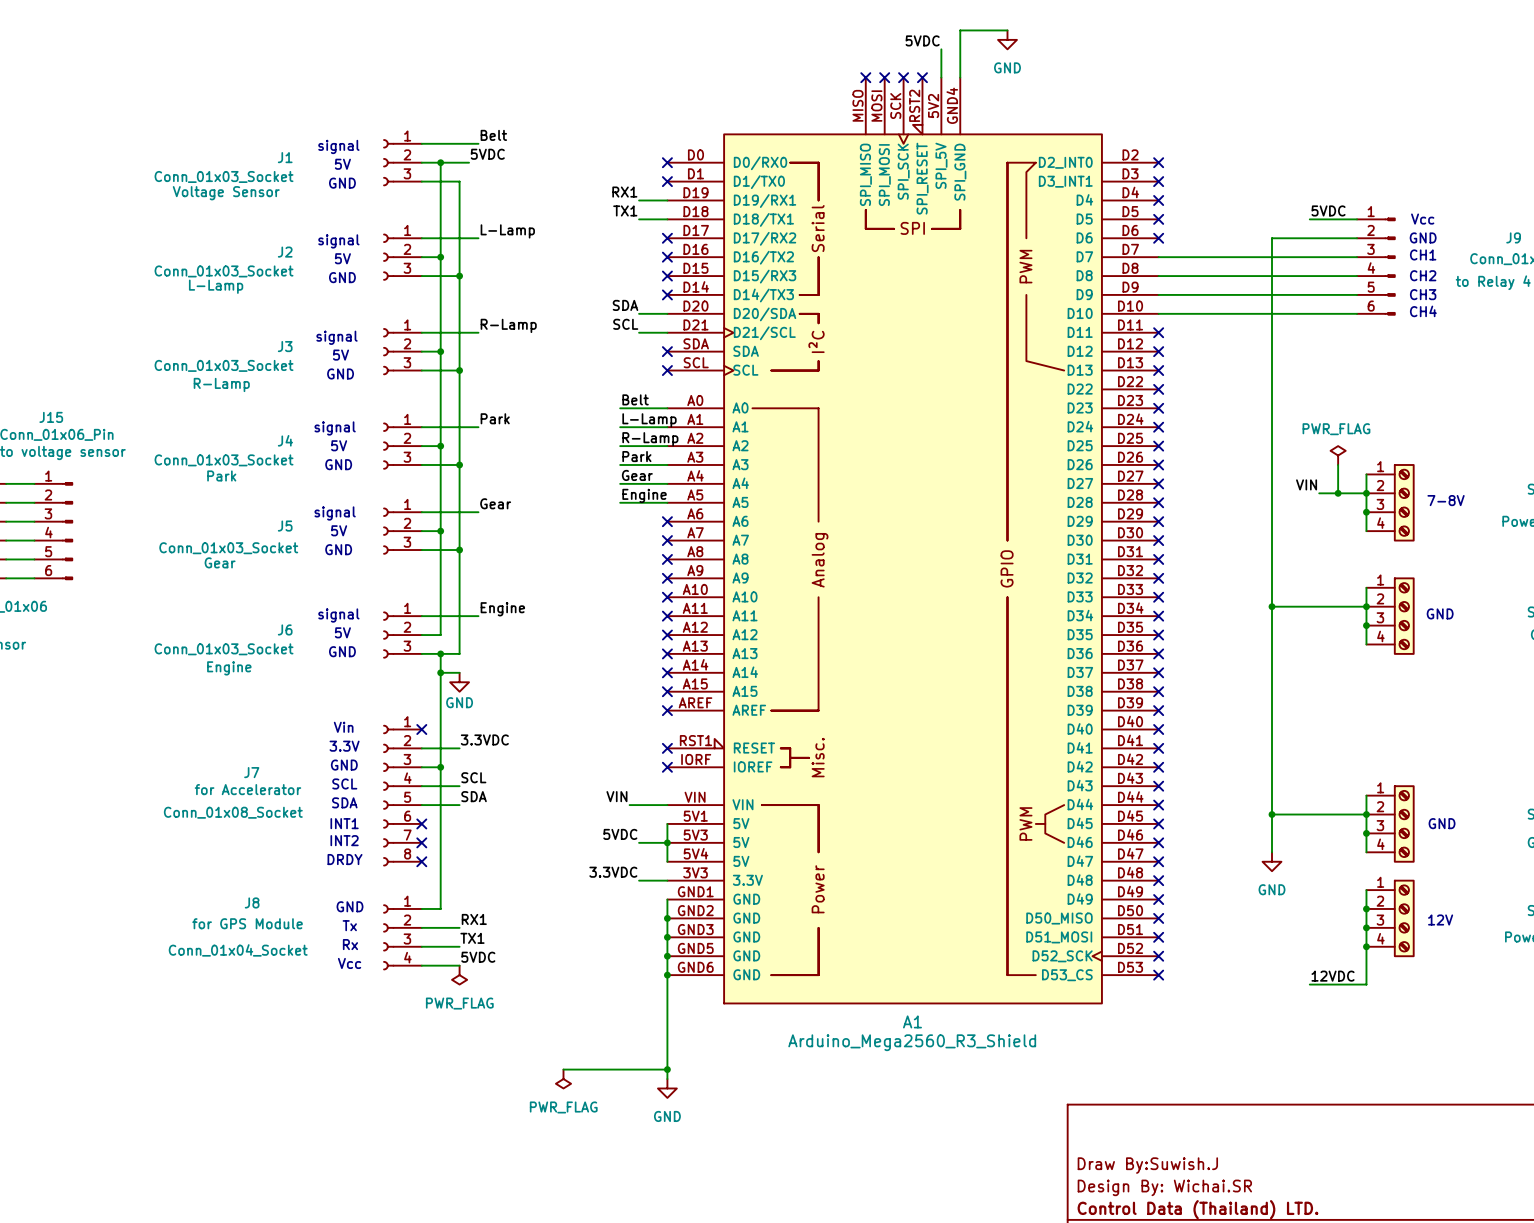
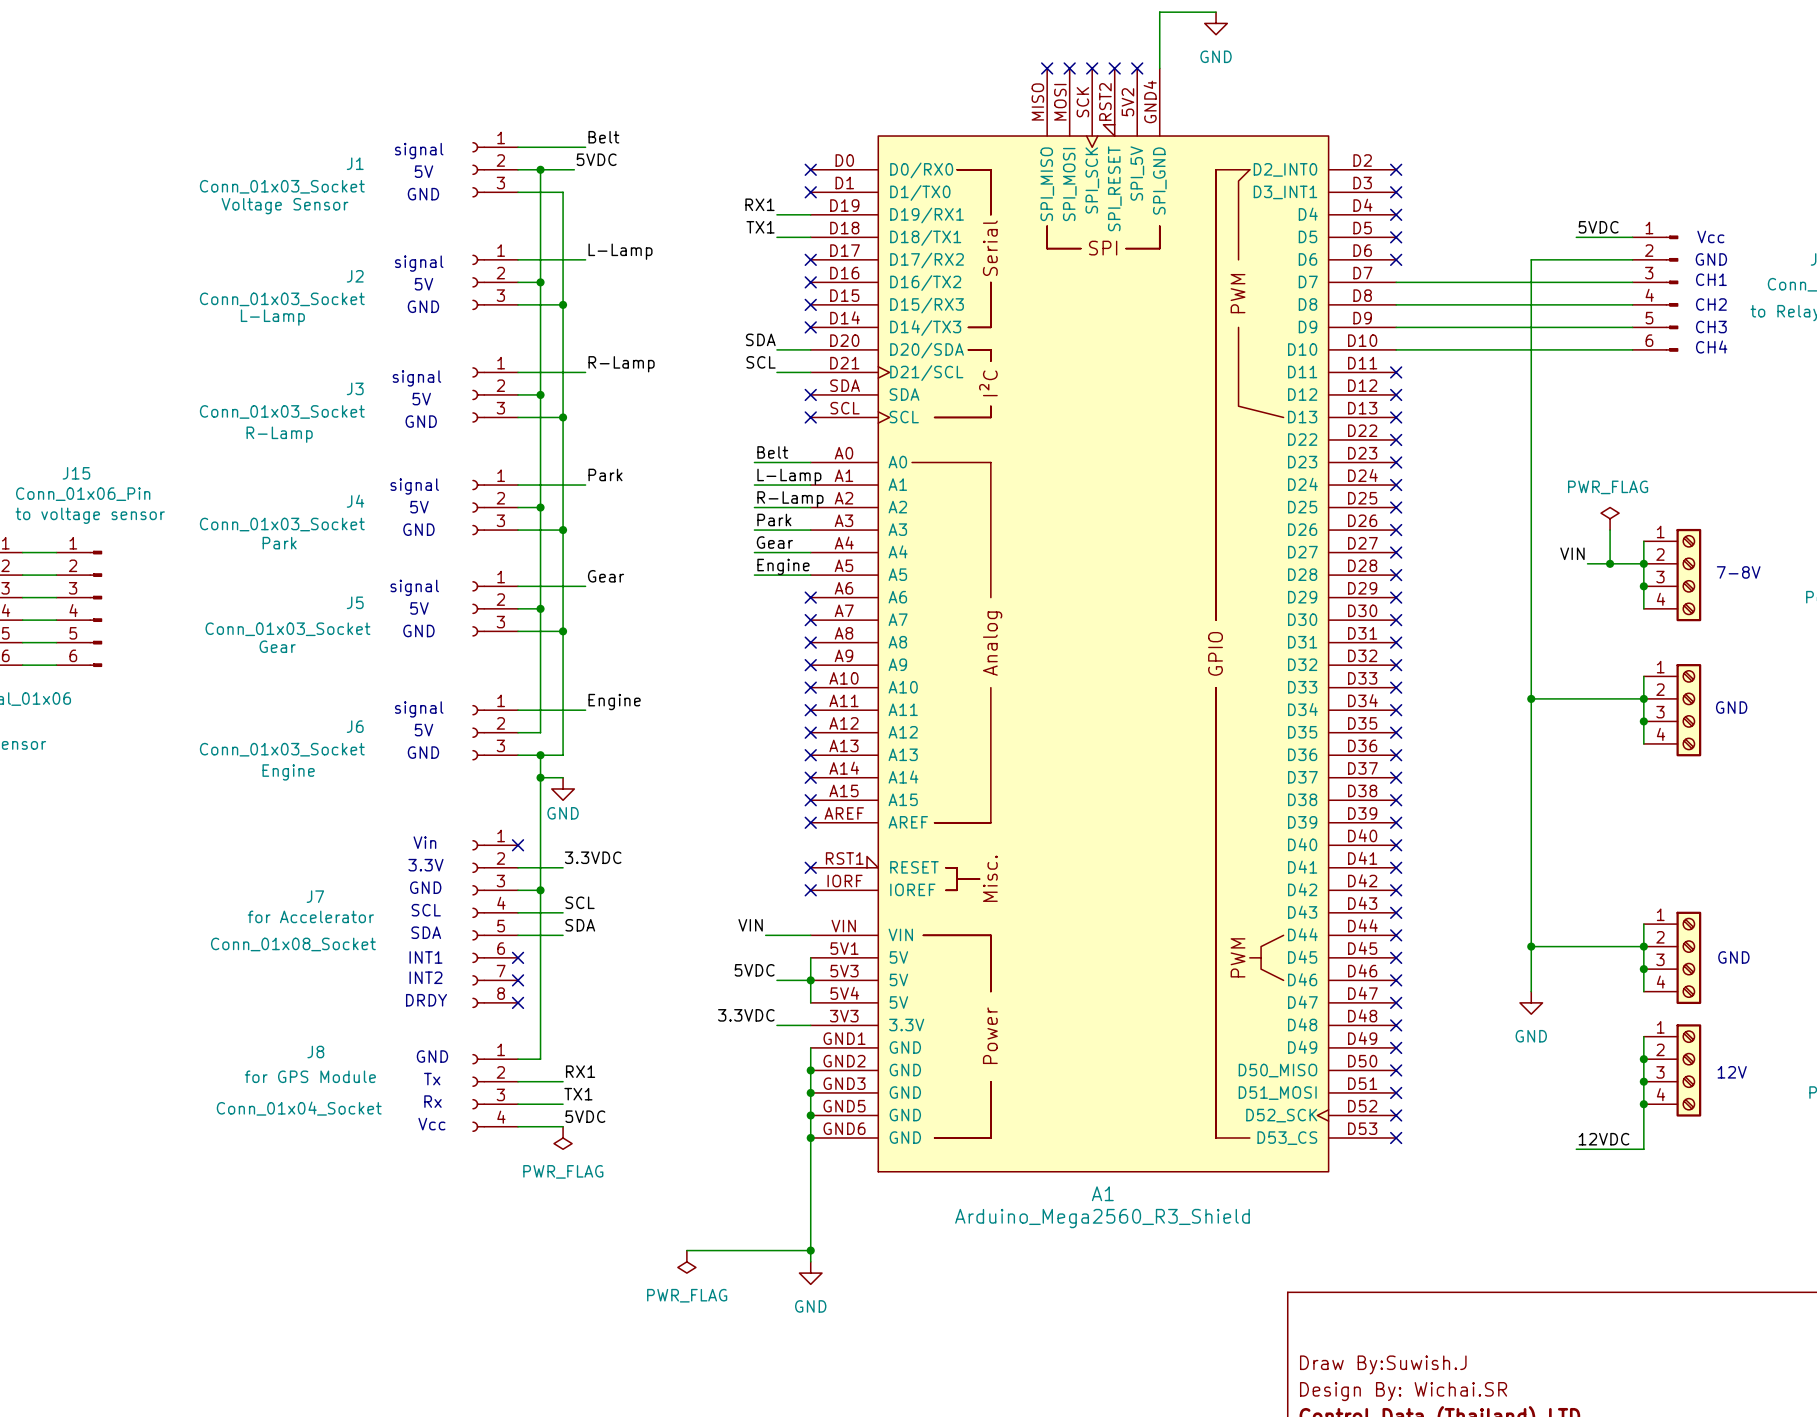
label: 5VDC (922, 40) -> none
wire: (941, 49) (941, 77) -> none
no-connect mark: none -> (1137, 68)

